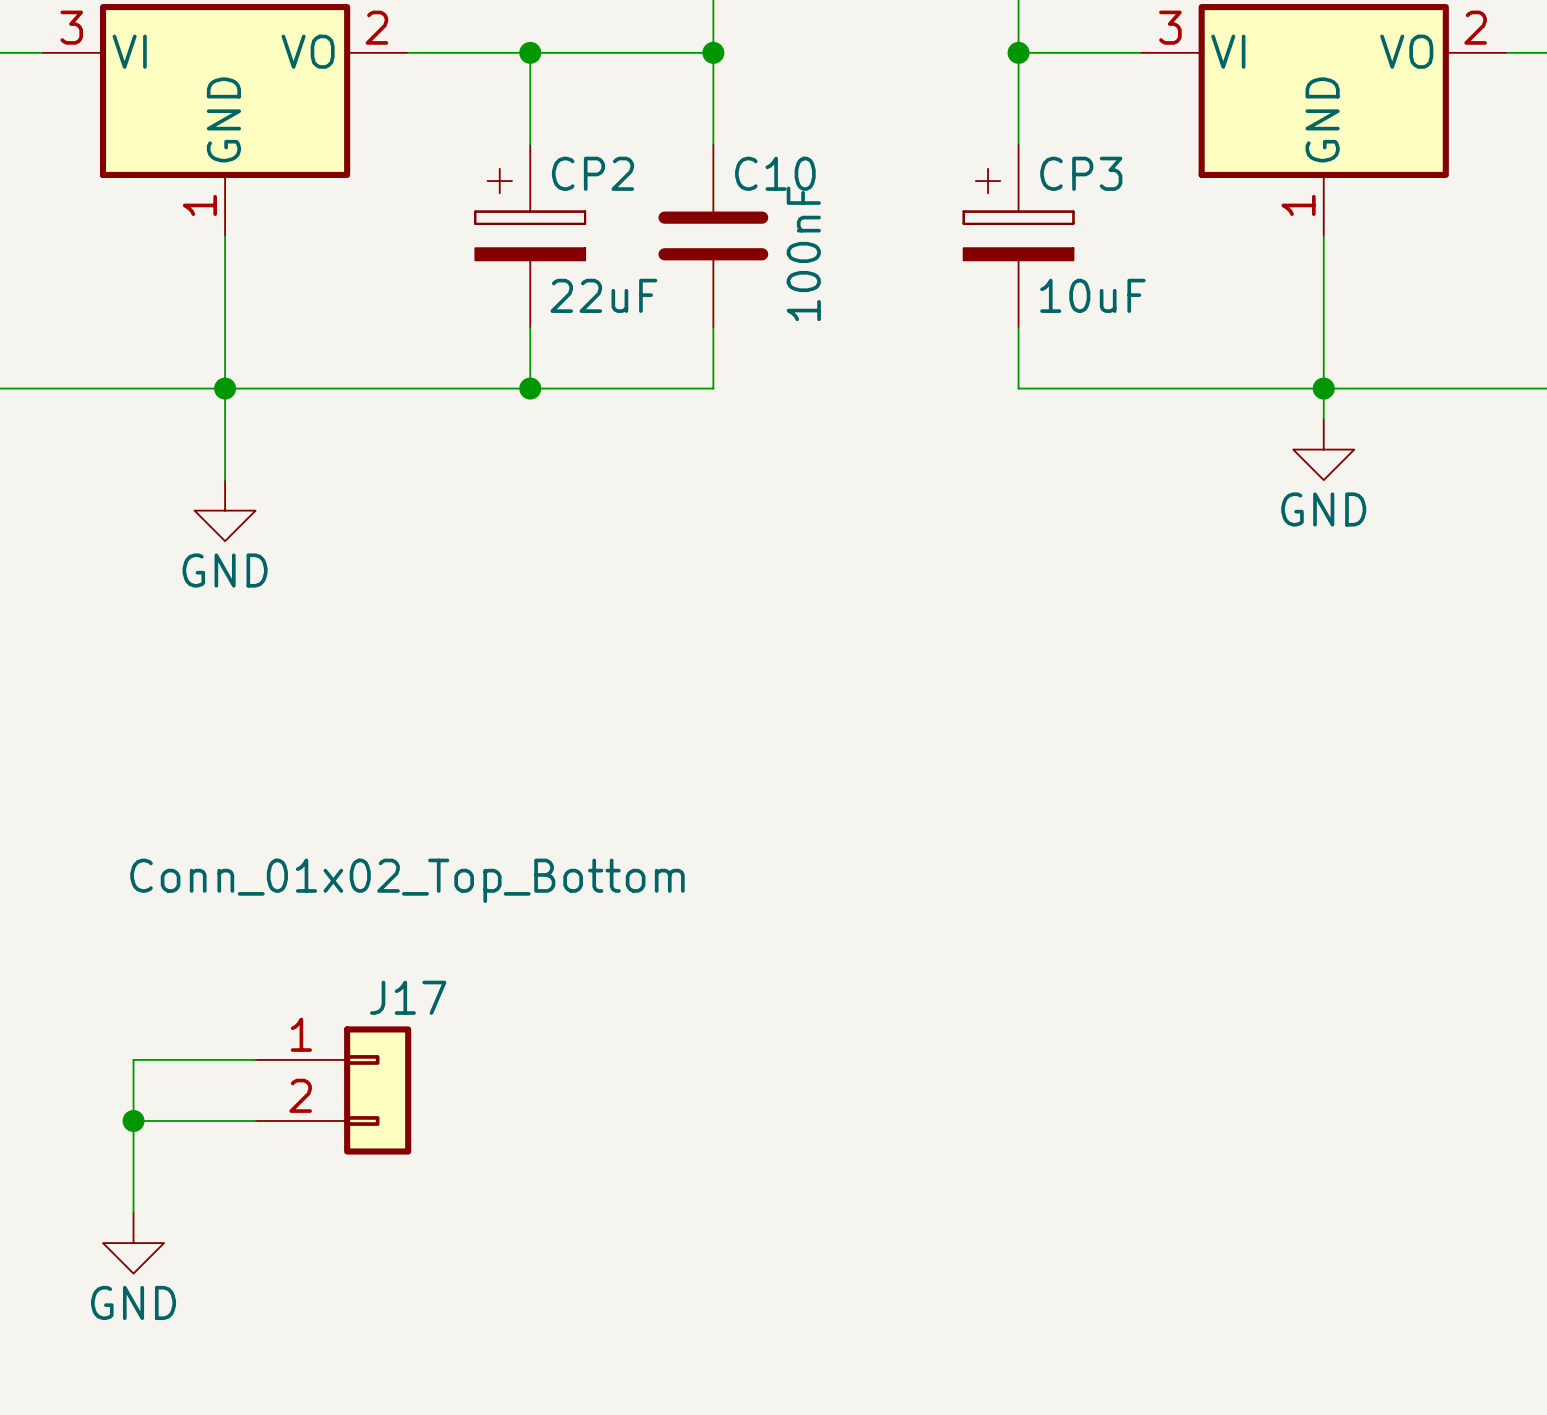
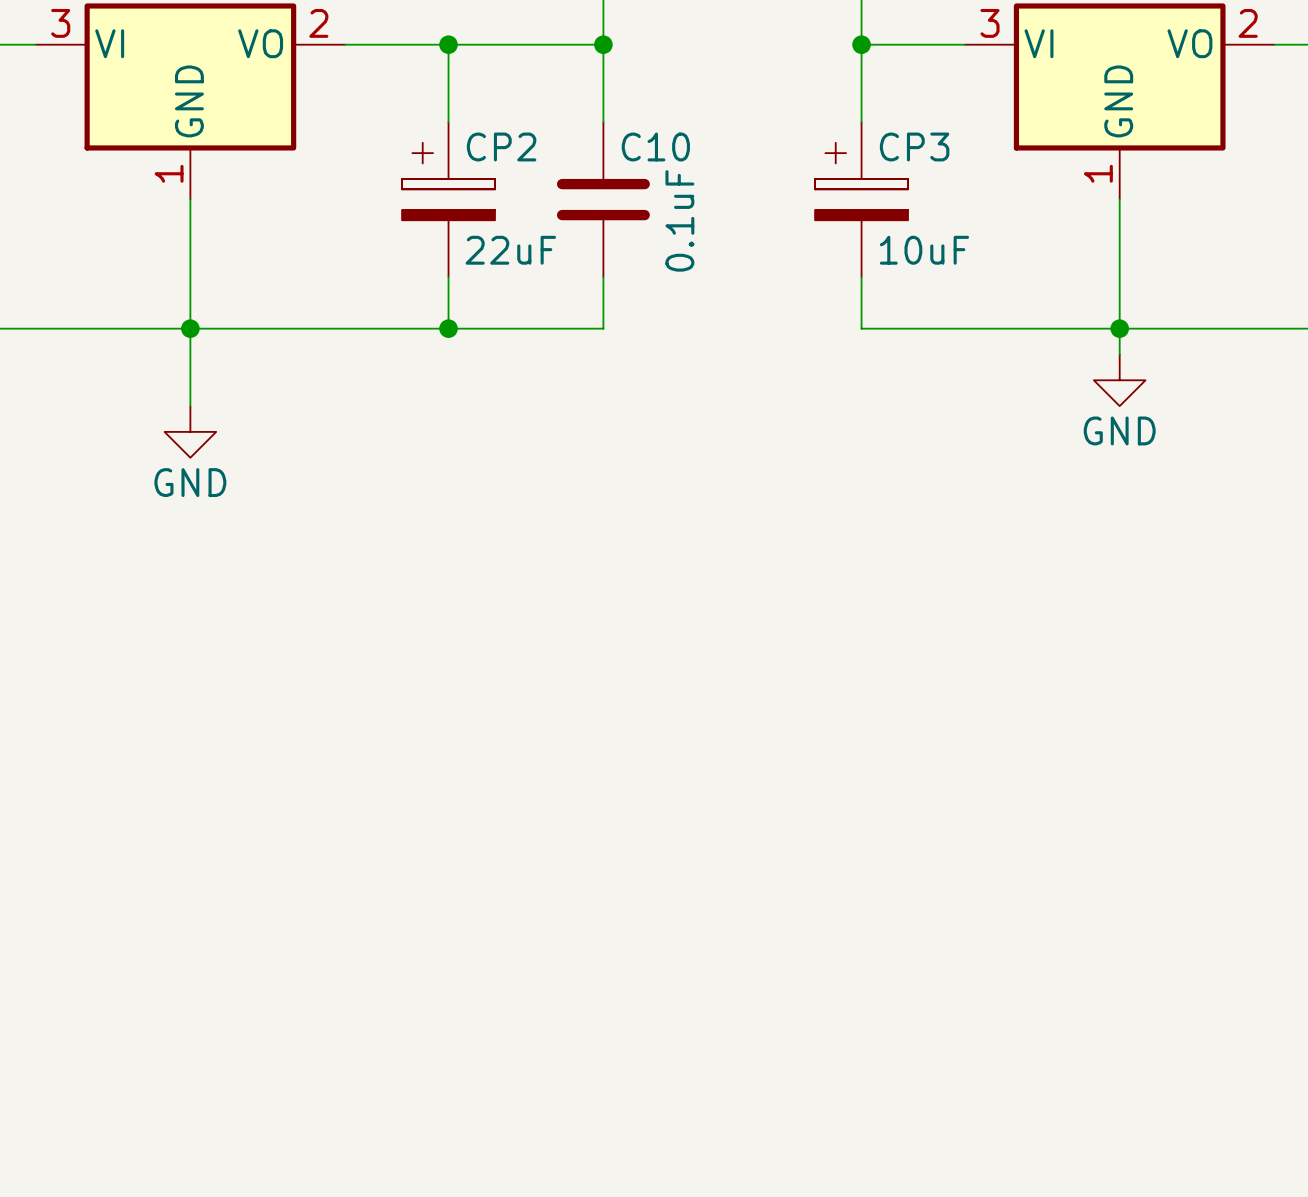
C10 value: 100nF (803, 253) -> 0.1uF (679, 220)
wire: (255, 1059) (133, 1059) (133, 1212) -> none
J17: Conn_01x02_Top_Bottom (333, 1090) -> none
wire: (133, 1120) (255, 1120) -> none
junction: (133, 1120) -> none
power symbol: GND (133, 1243) -> none

